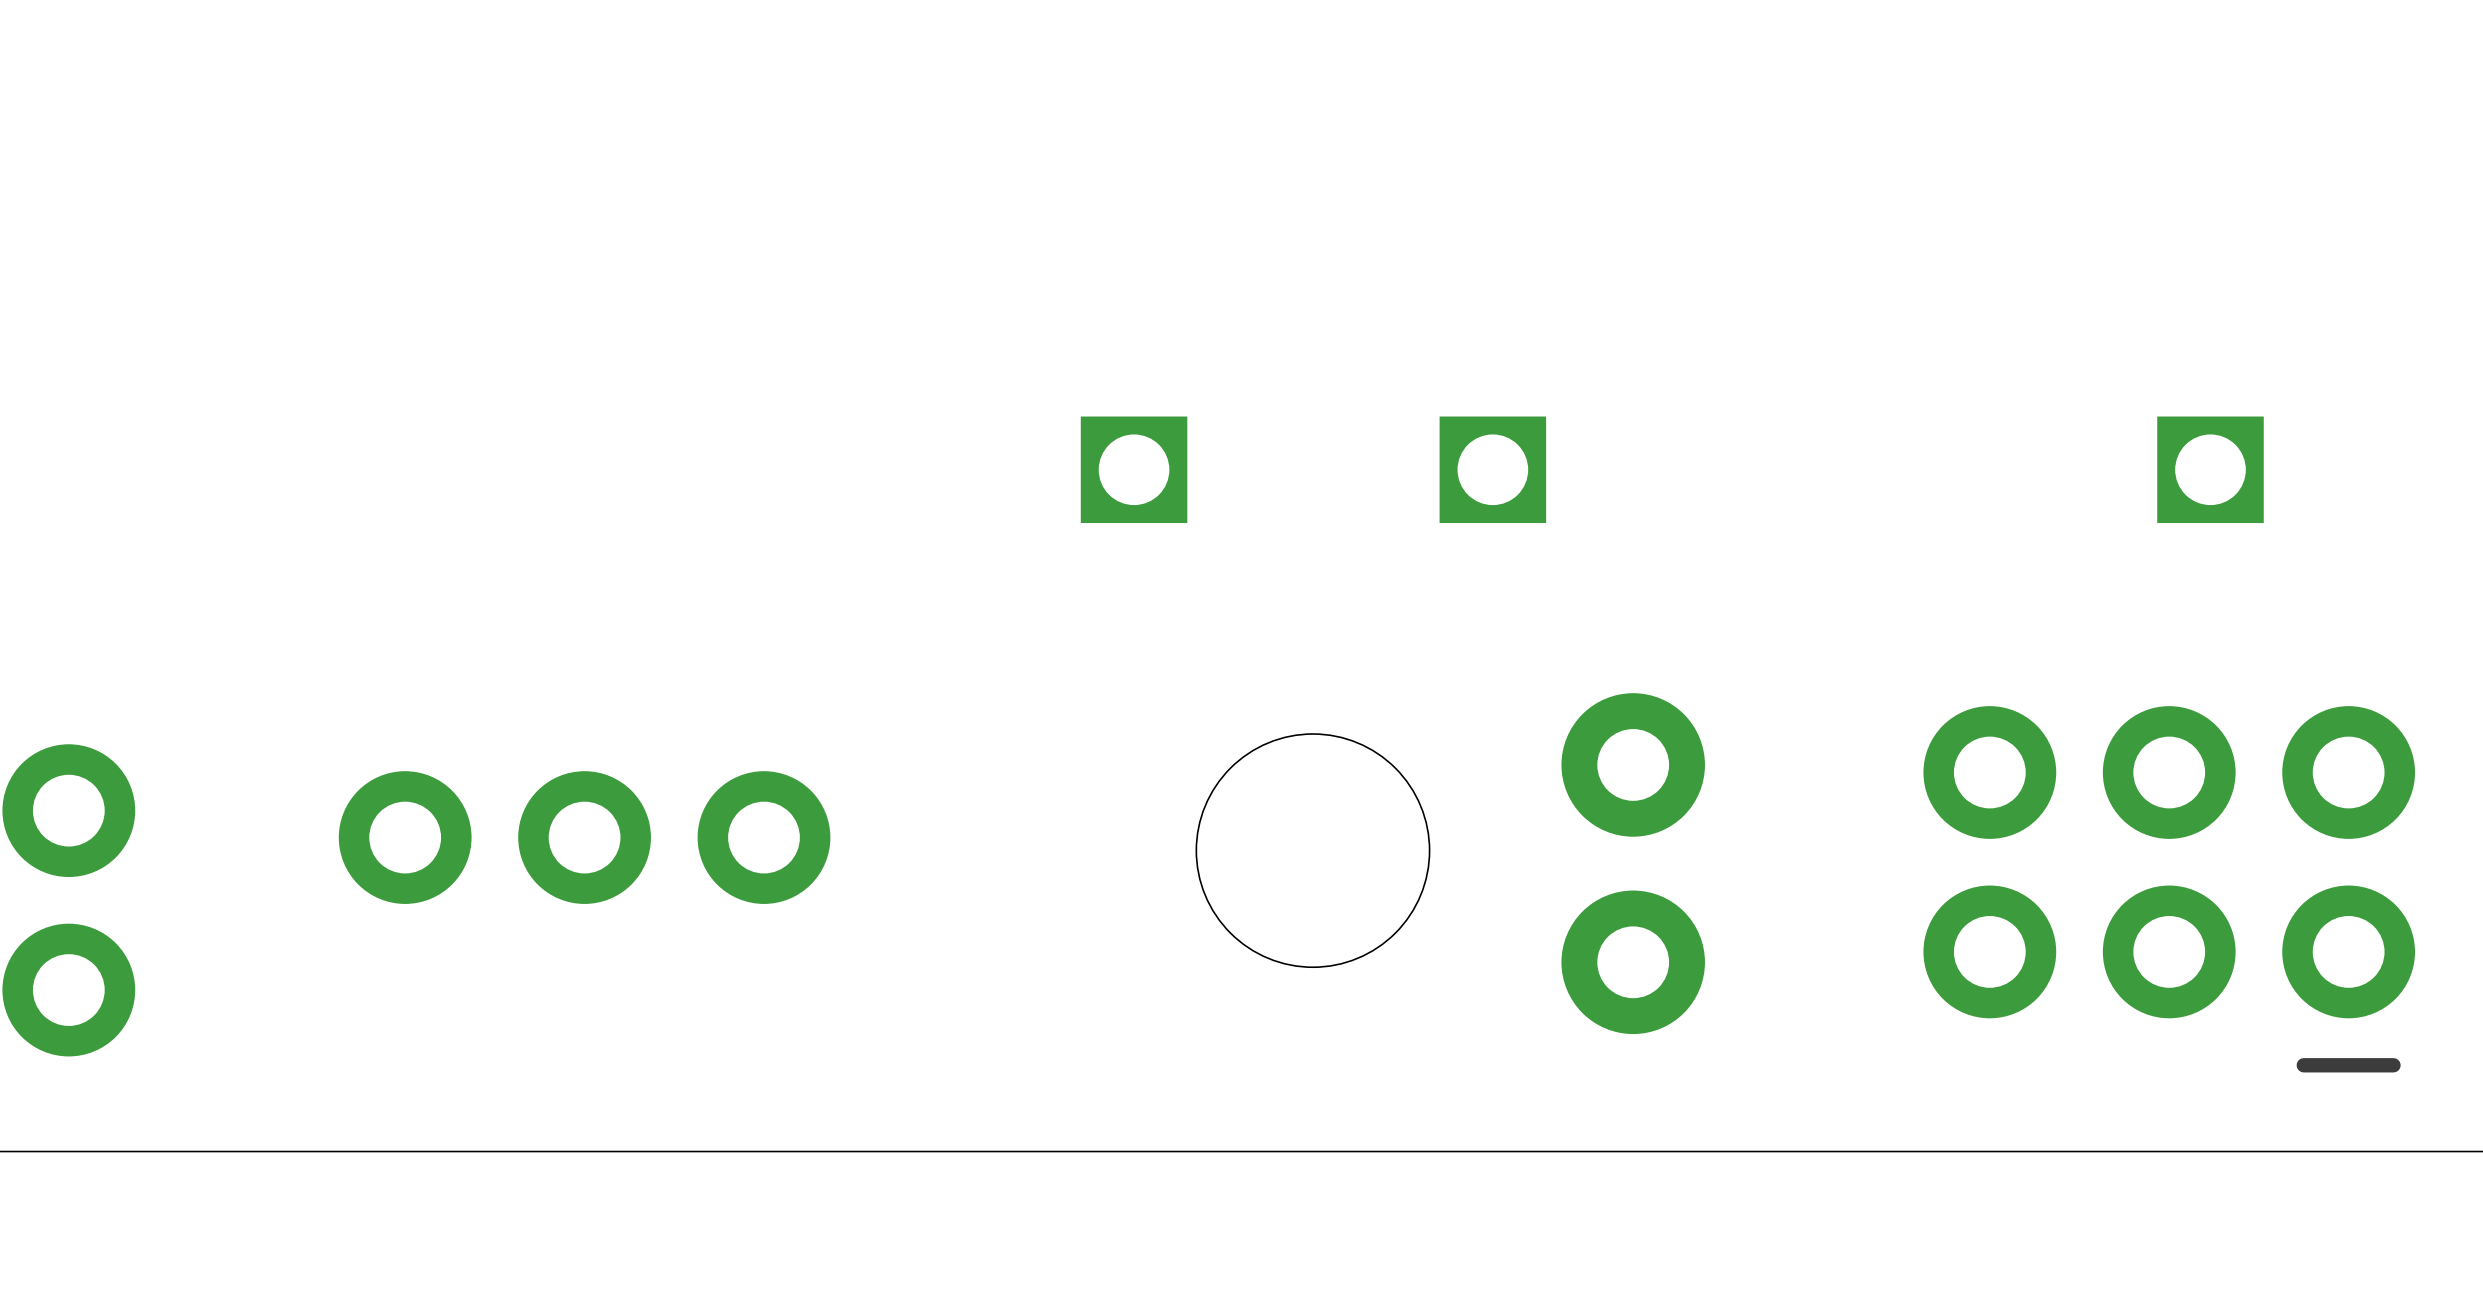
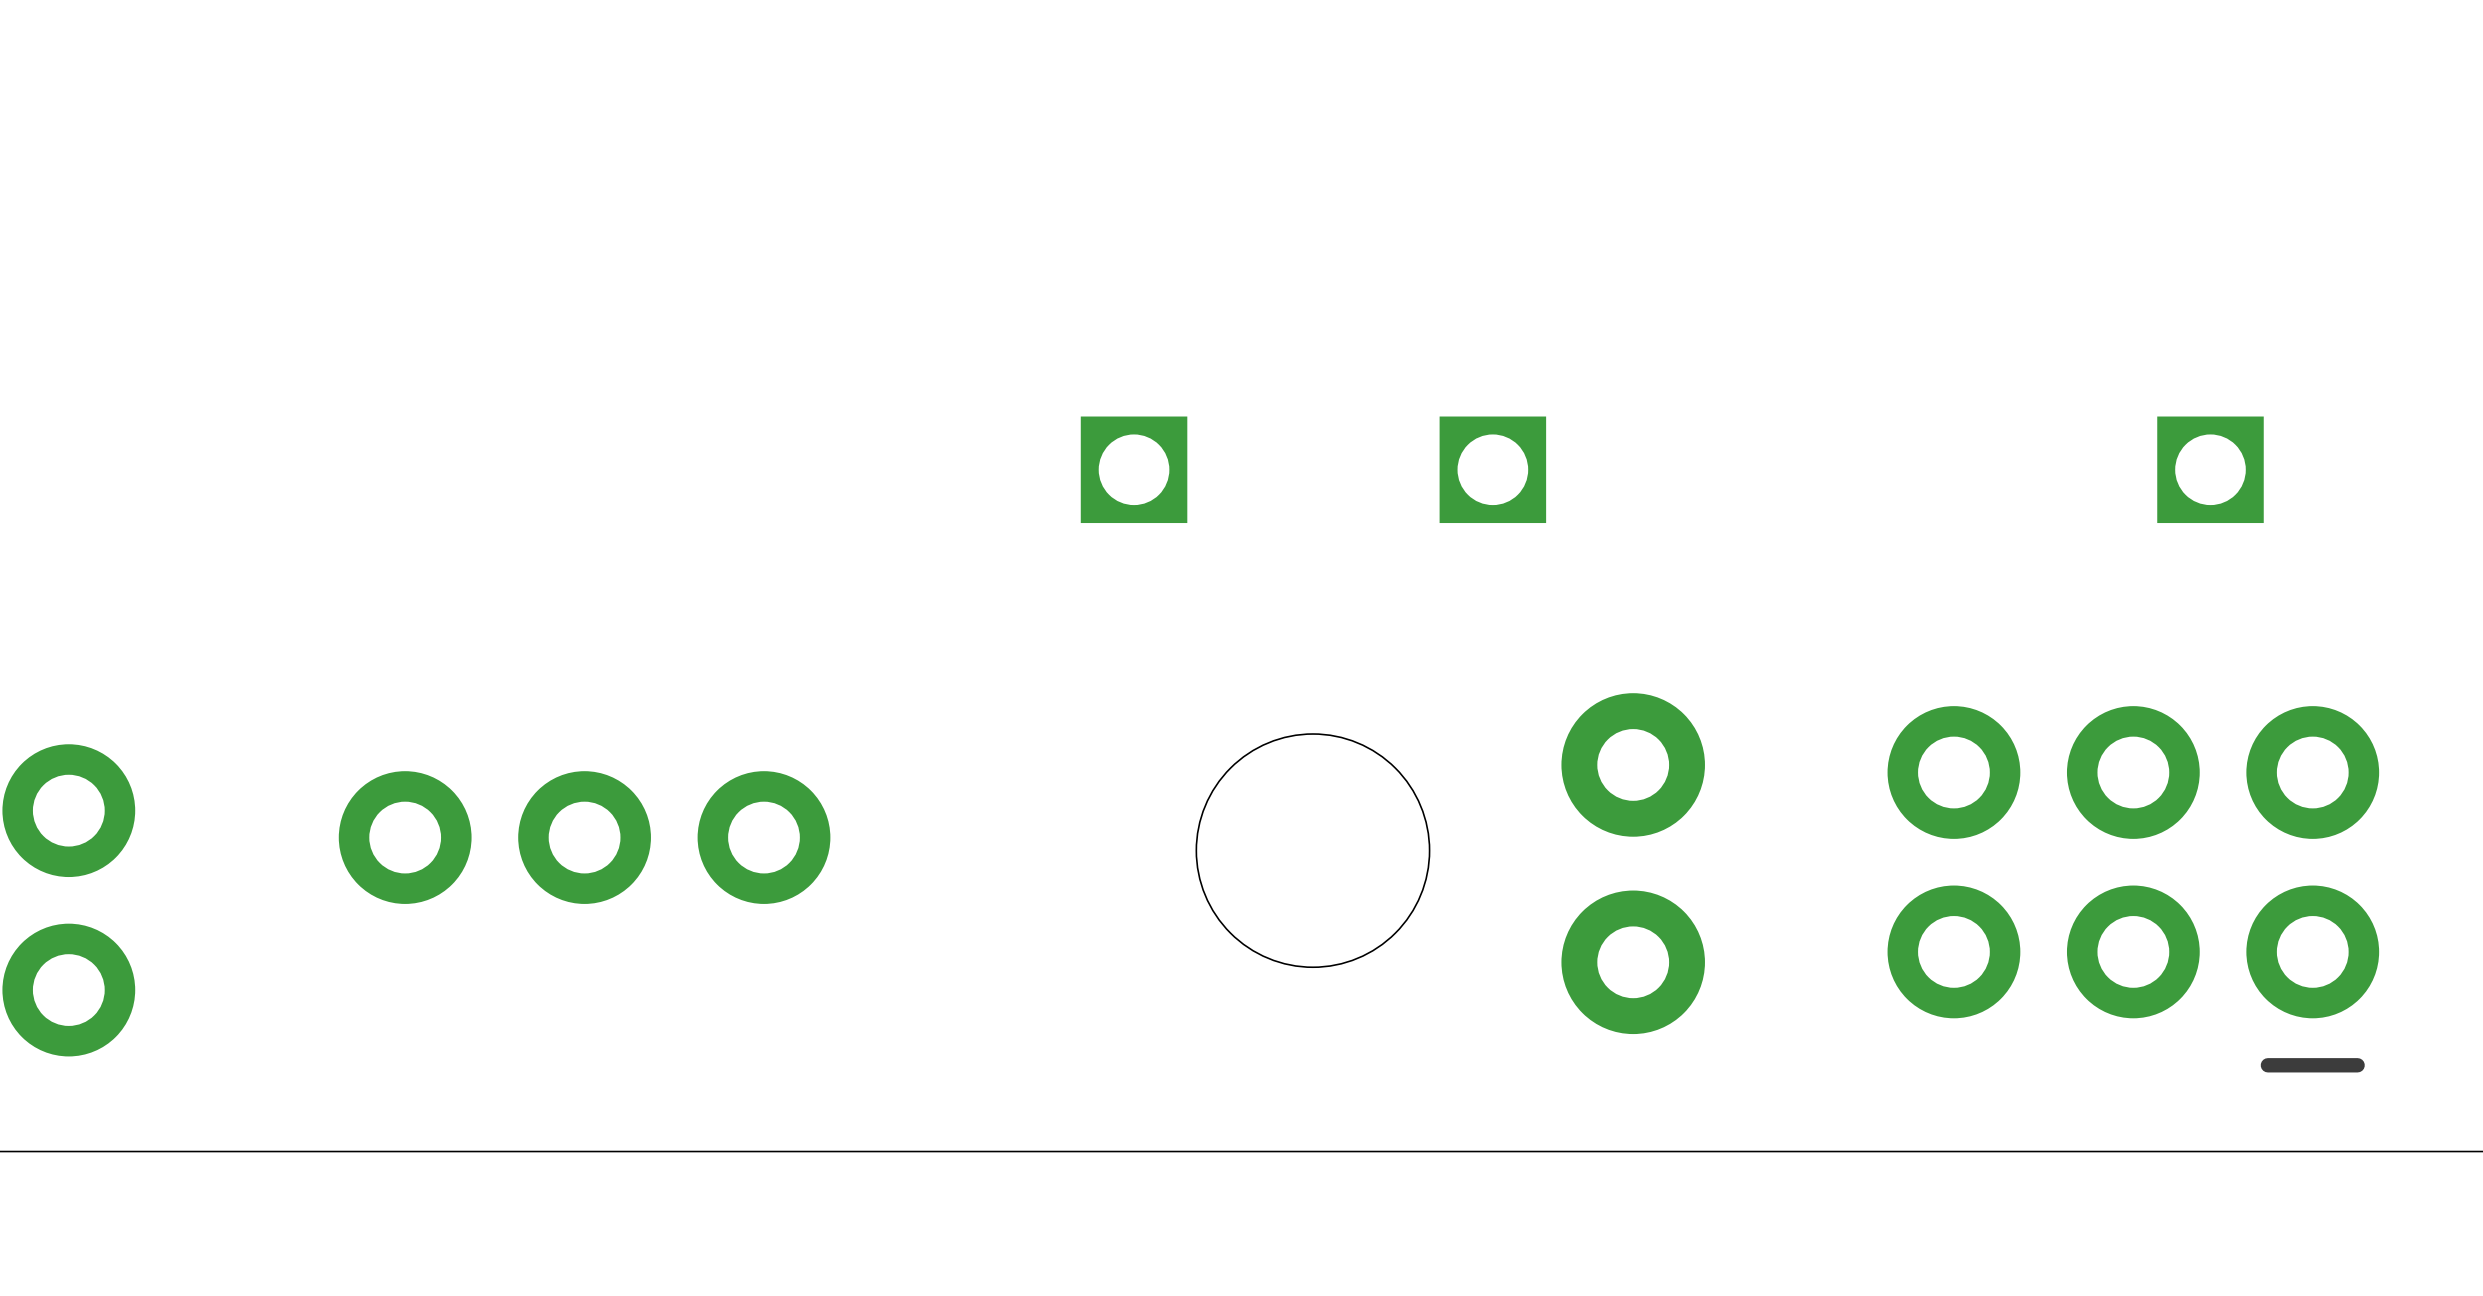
part position: (2169, 889) -> (2133, 889)

